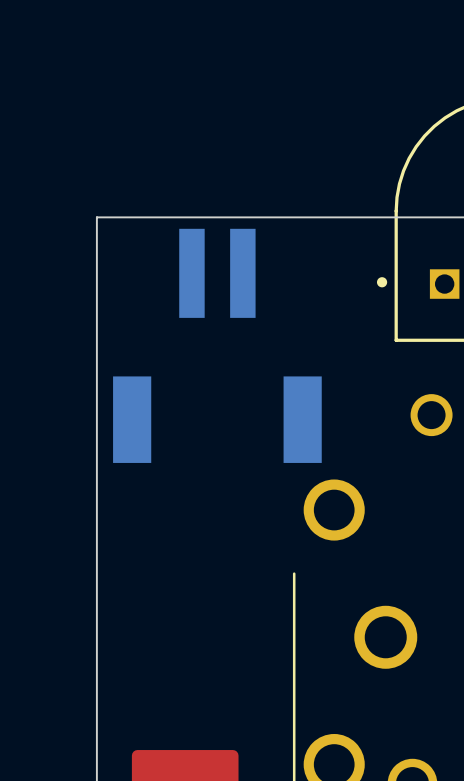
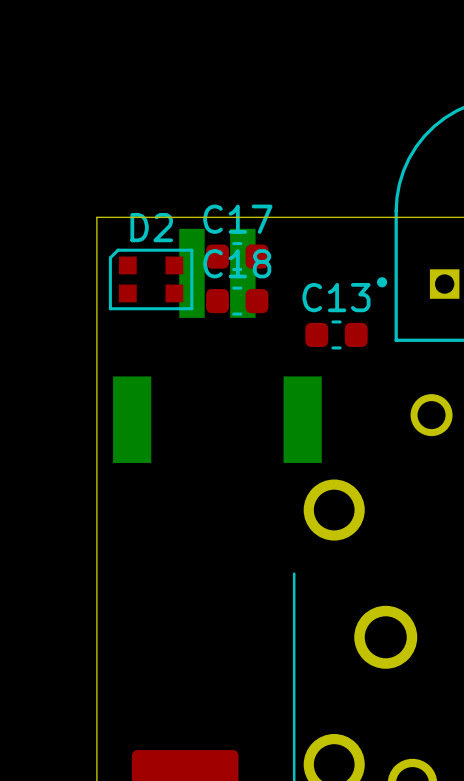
C17: none -> (237, 256)
D2: none -> (151, 279)
C18: none -> (237, 301)
C13: none -> (336, 334)

